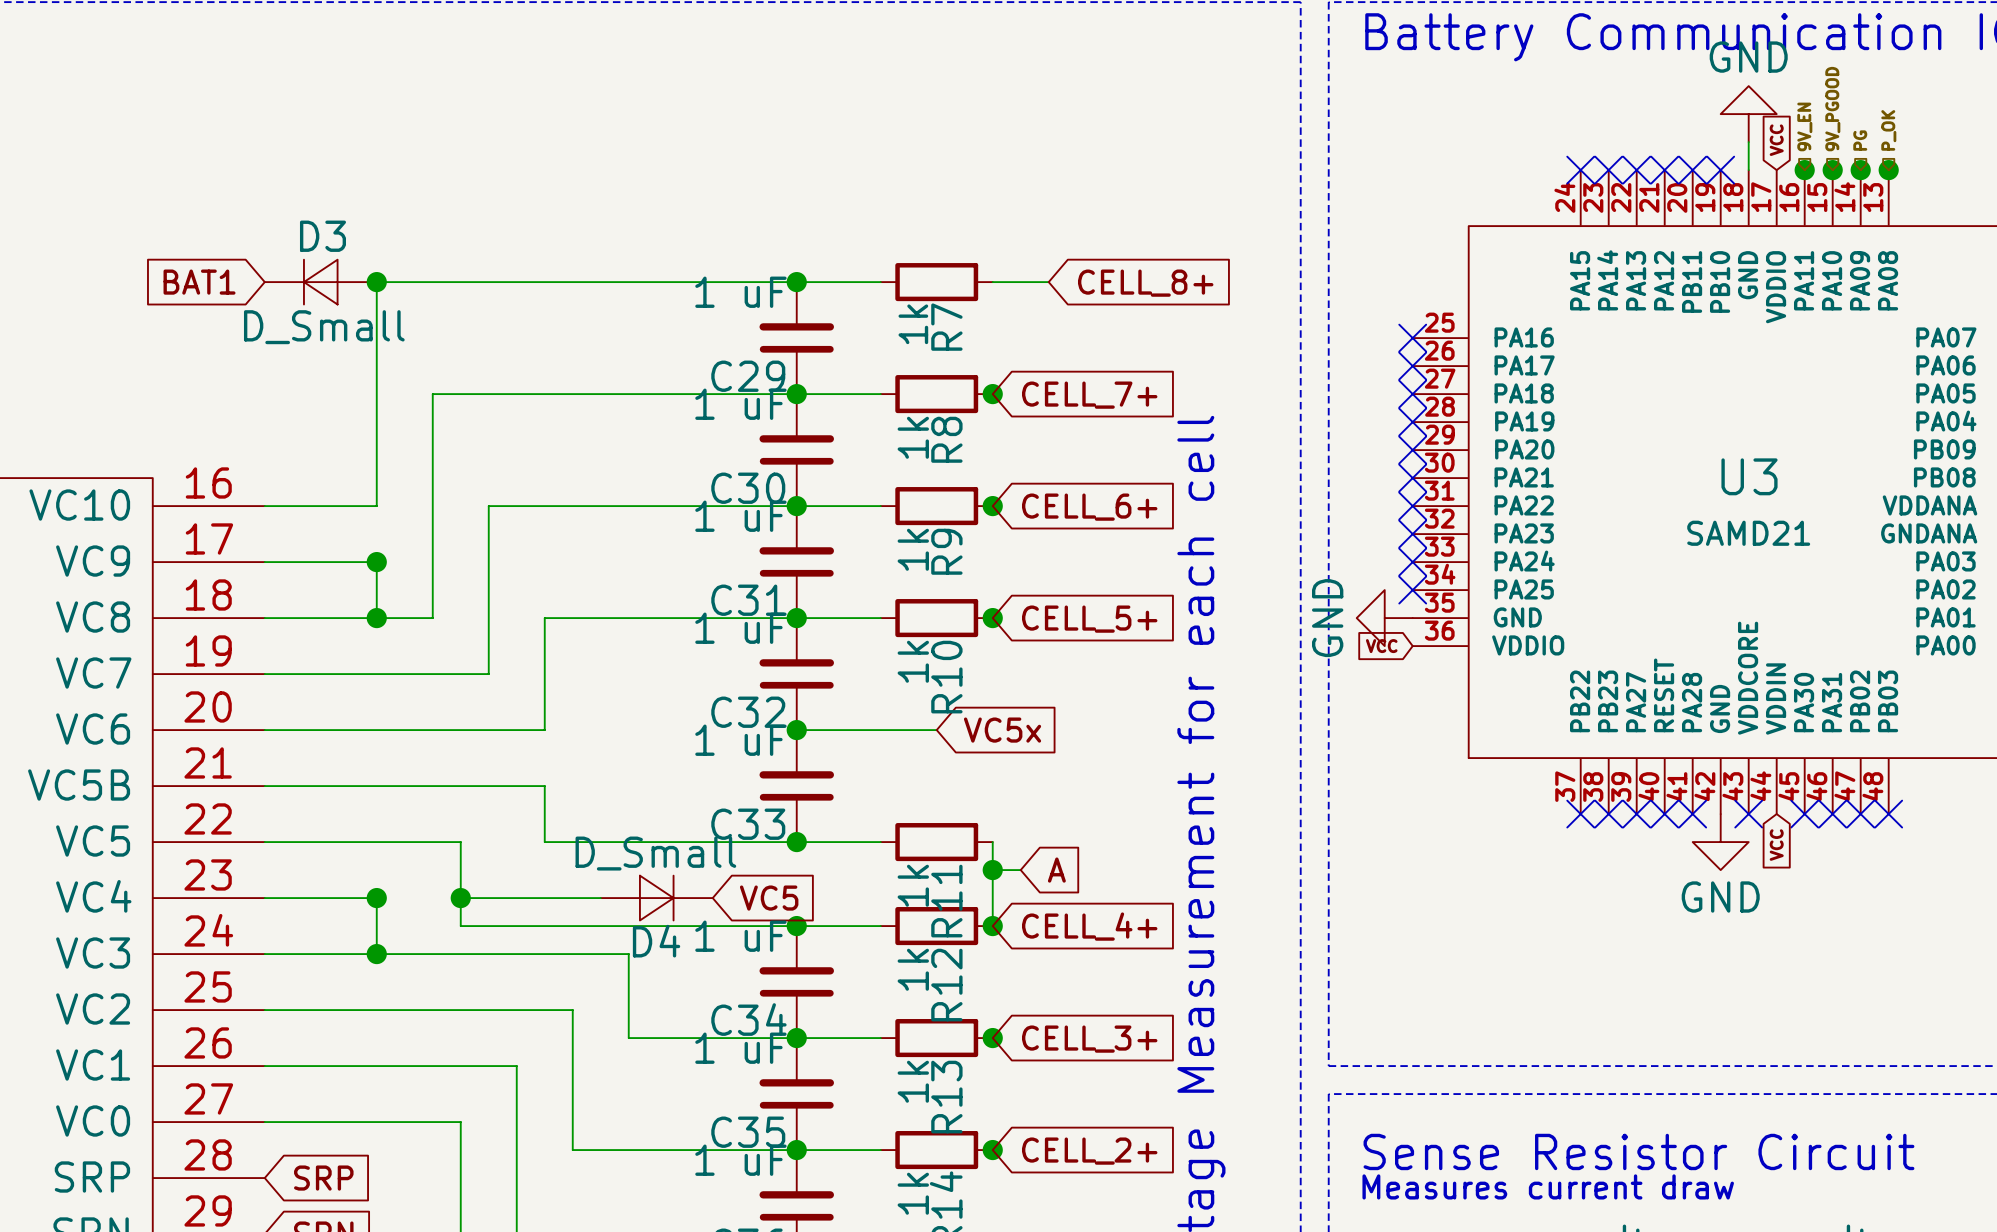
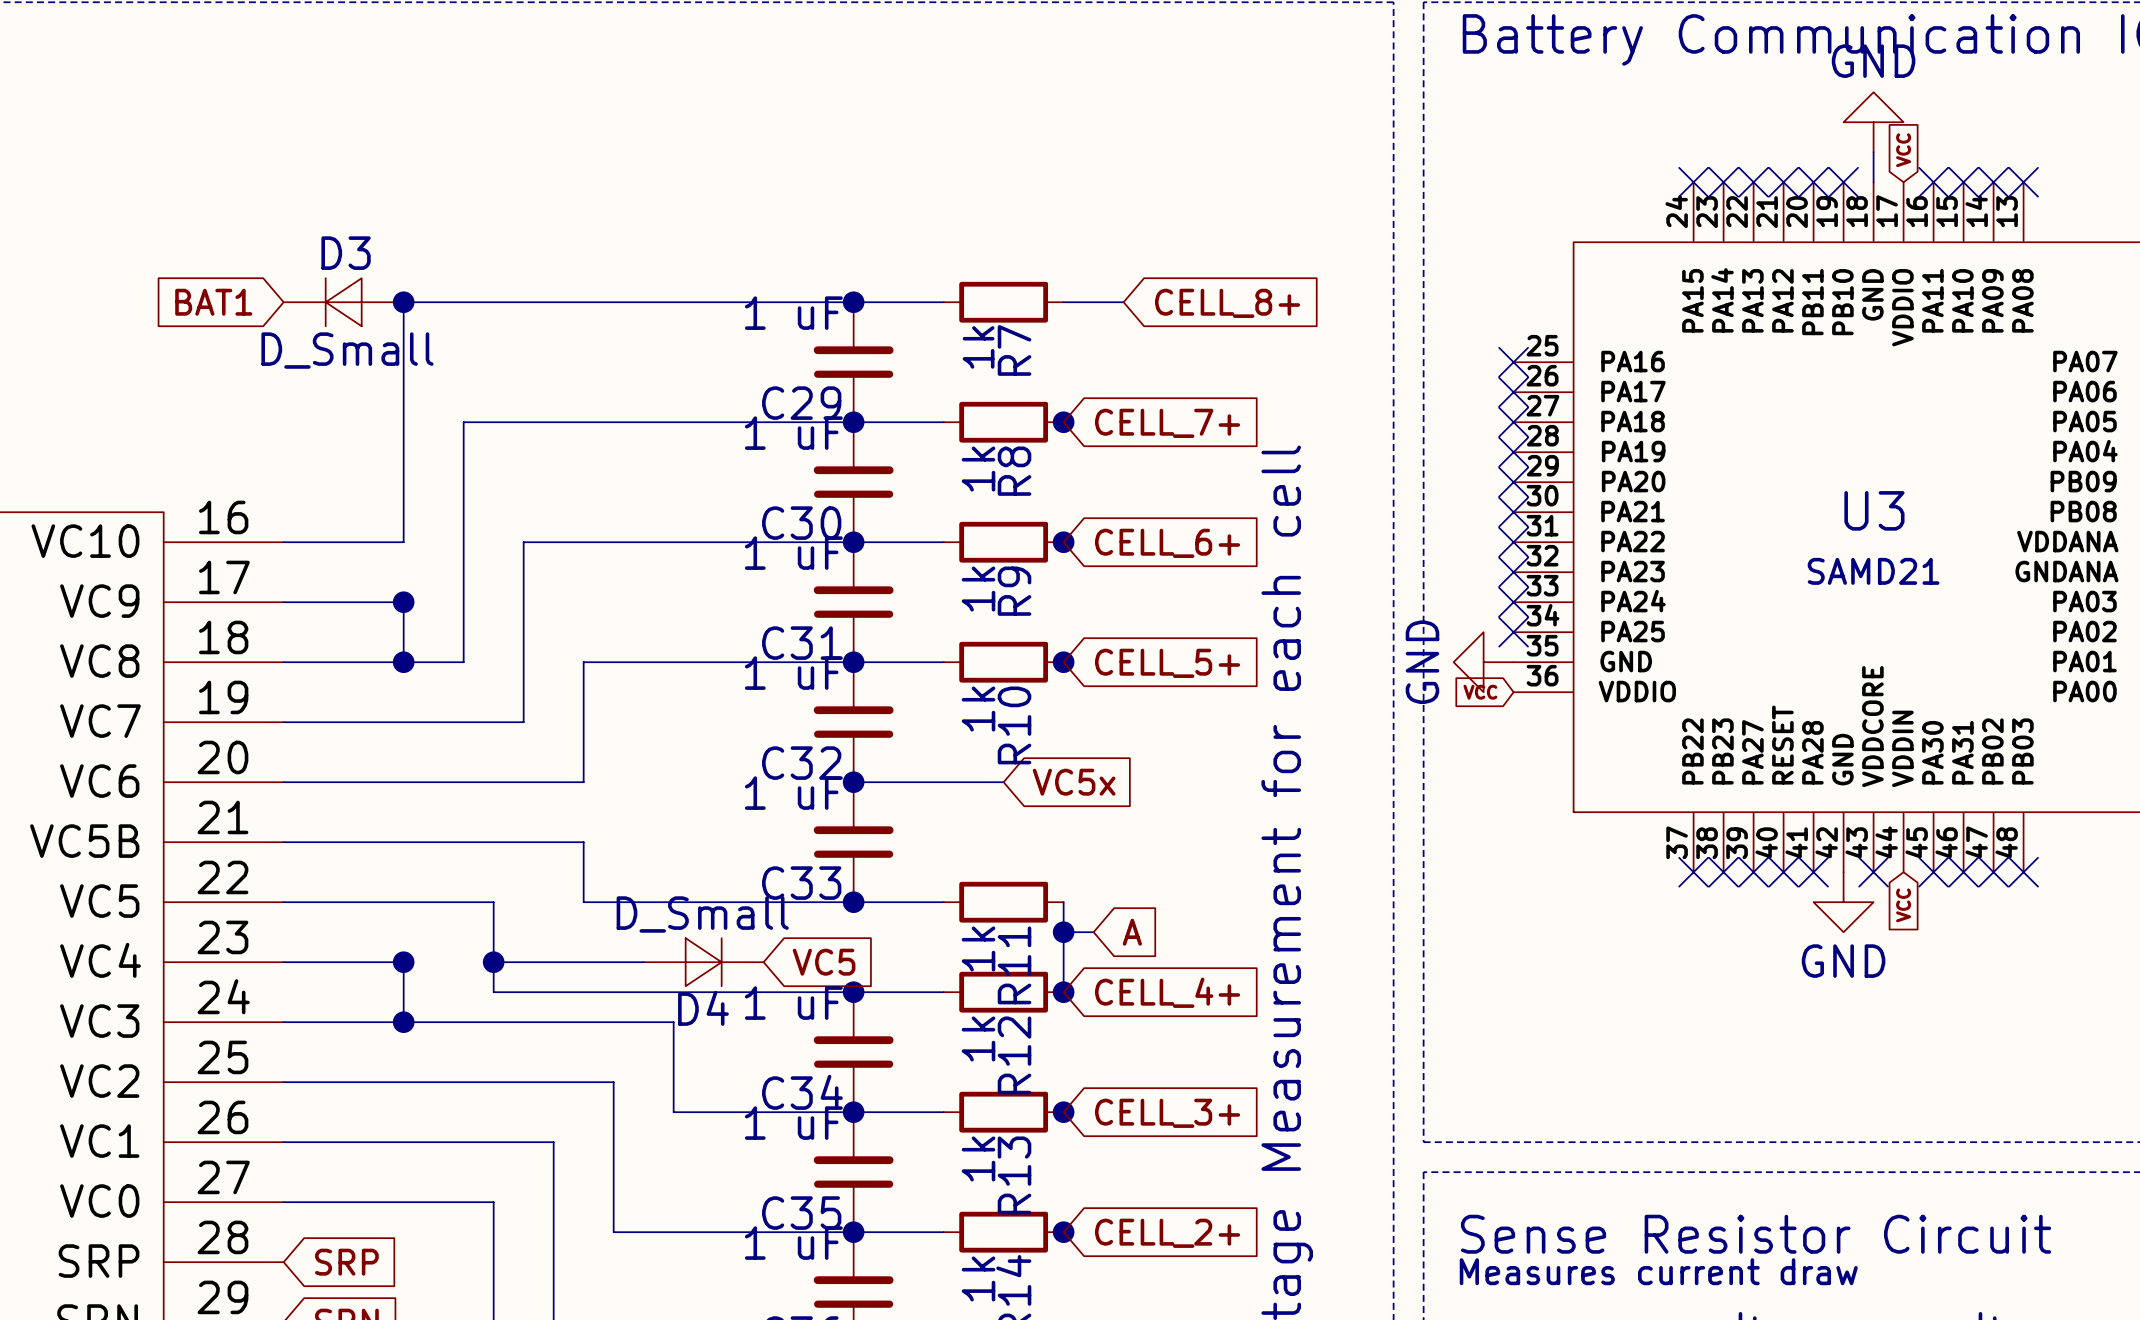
hierarchical label: 9V_PGOOD (1832, 109) -> none
hierarchical label: 9V_EN (1804, 126) -> none
hierarchical label: P_OK (1888, 130) -> none
hierarchical label: PG (1860, 140) -> none
junction: (1804, 170) -> none
no-connect mark: none -> (1933, 182)
junction: (1832, 170) -> none
no-connect mark: none -> (1963, 182)
junction: (1860, 170) -> none
no-connect mark: none -> (1993, 182)
junction: (1888, 170) -> none
no-connect mark: none -> (2023, 182)

